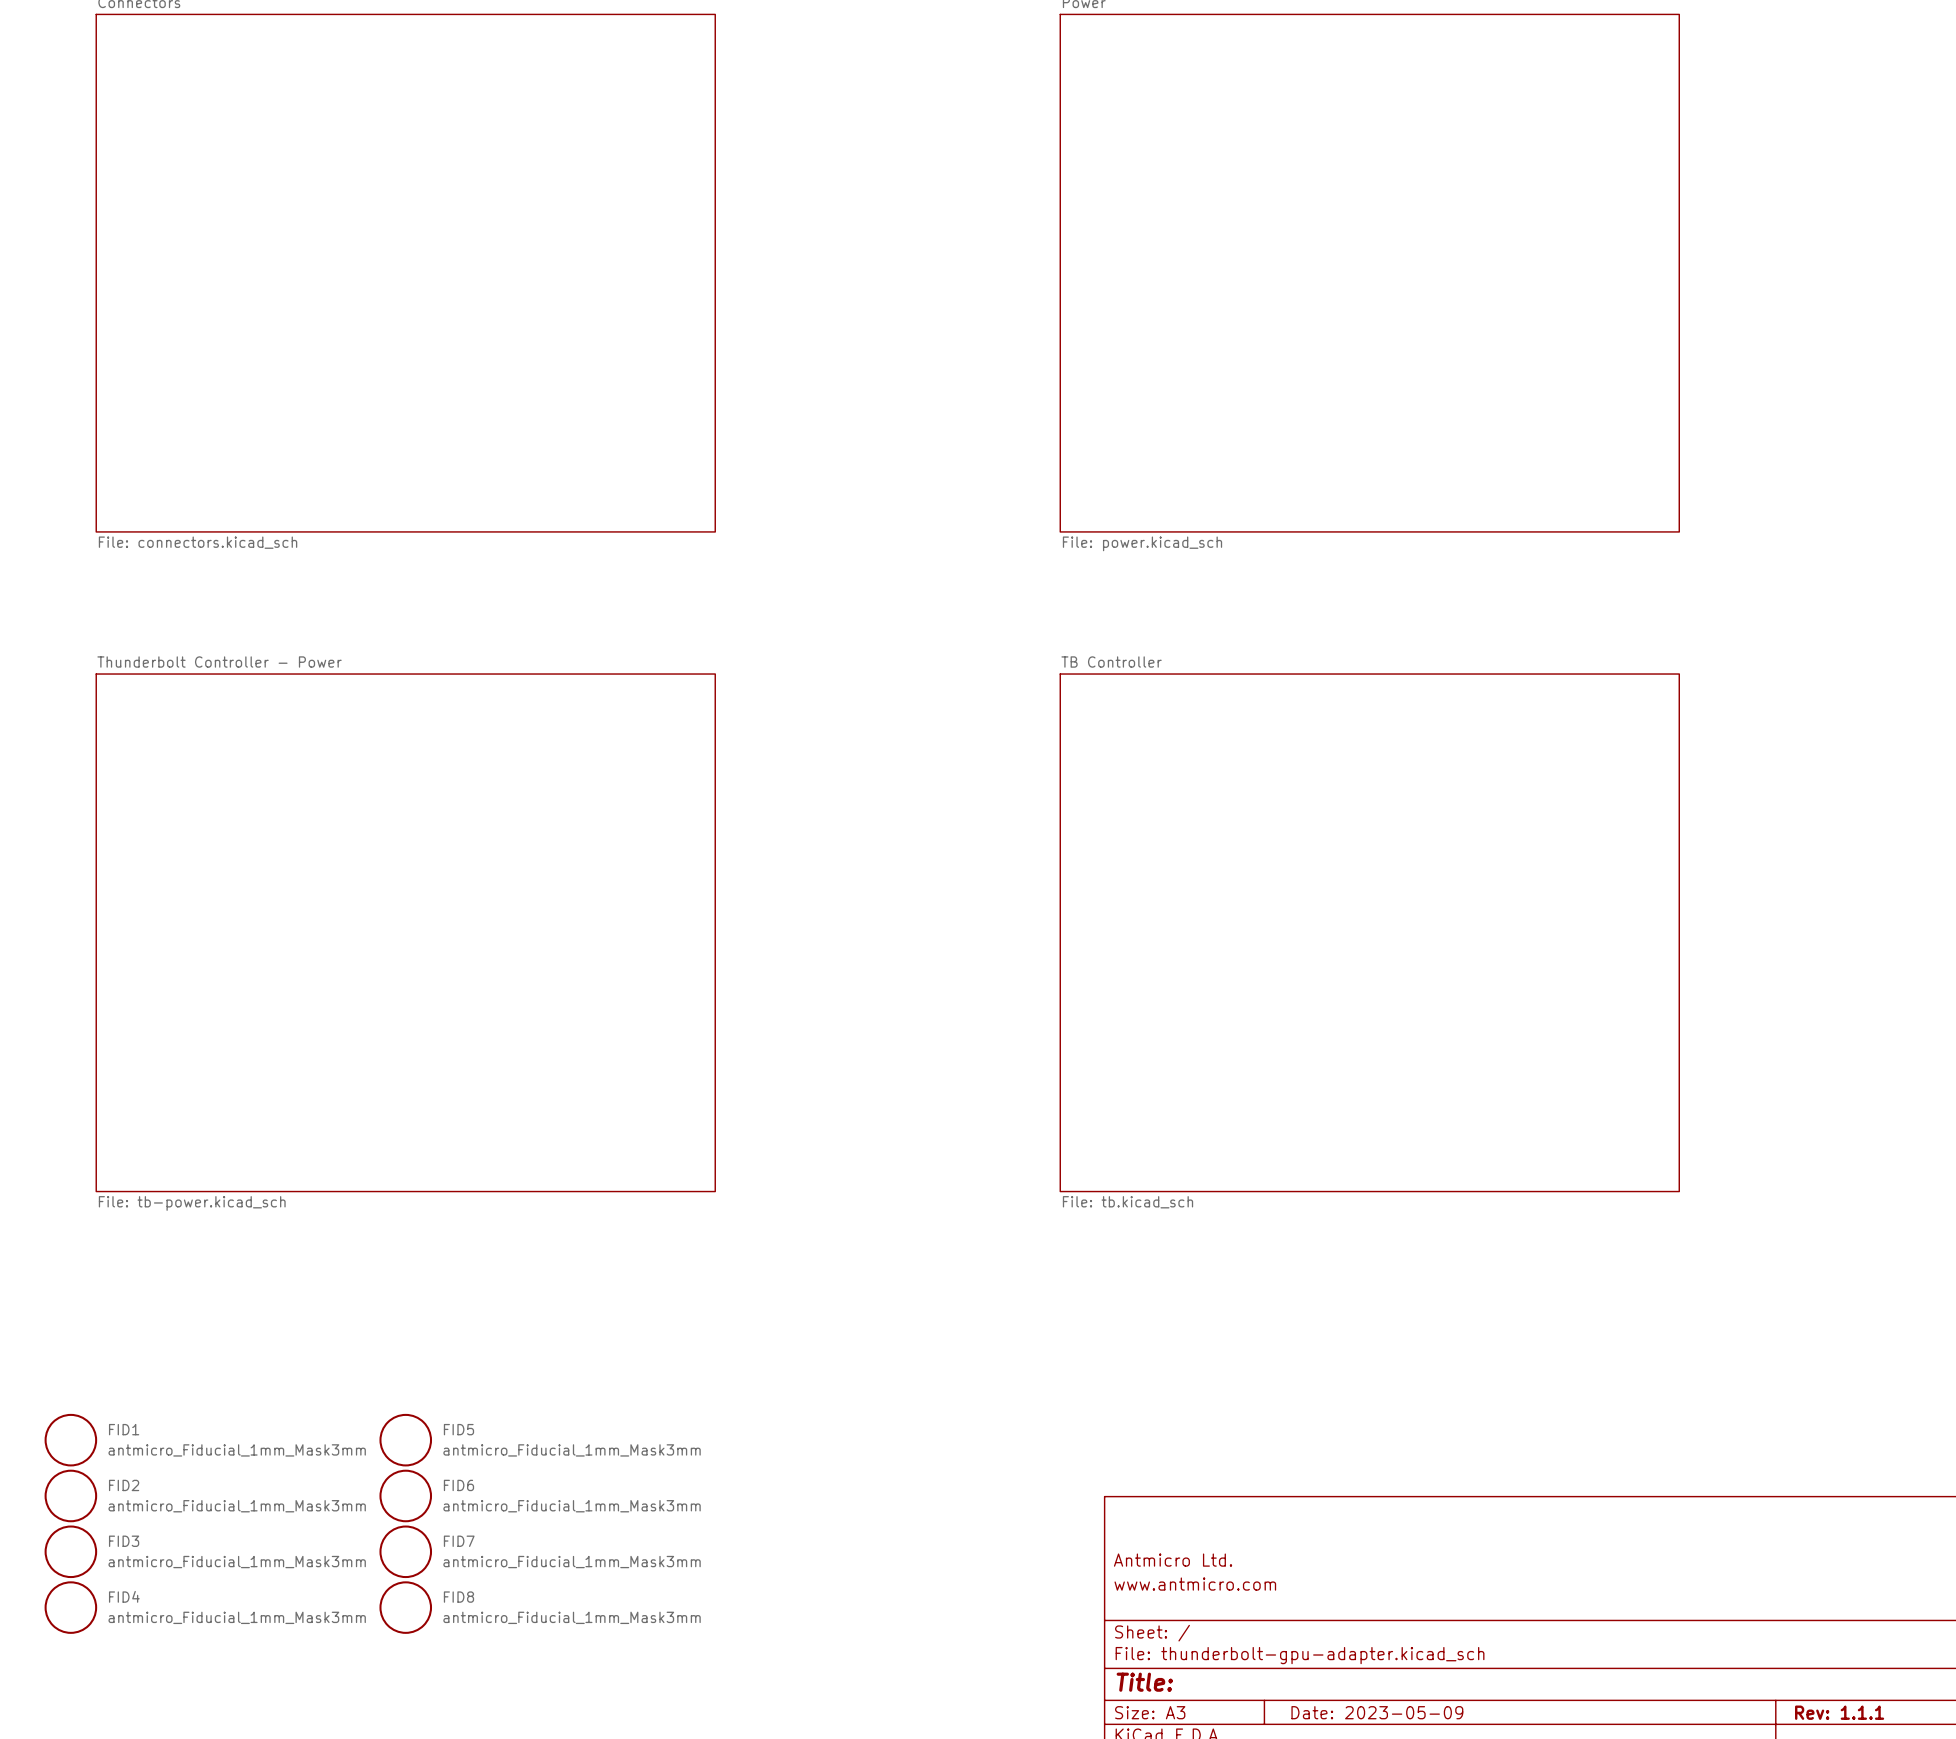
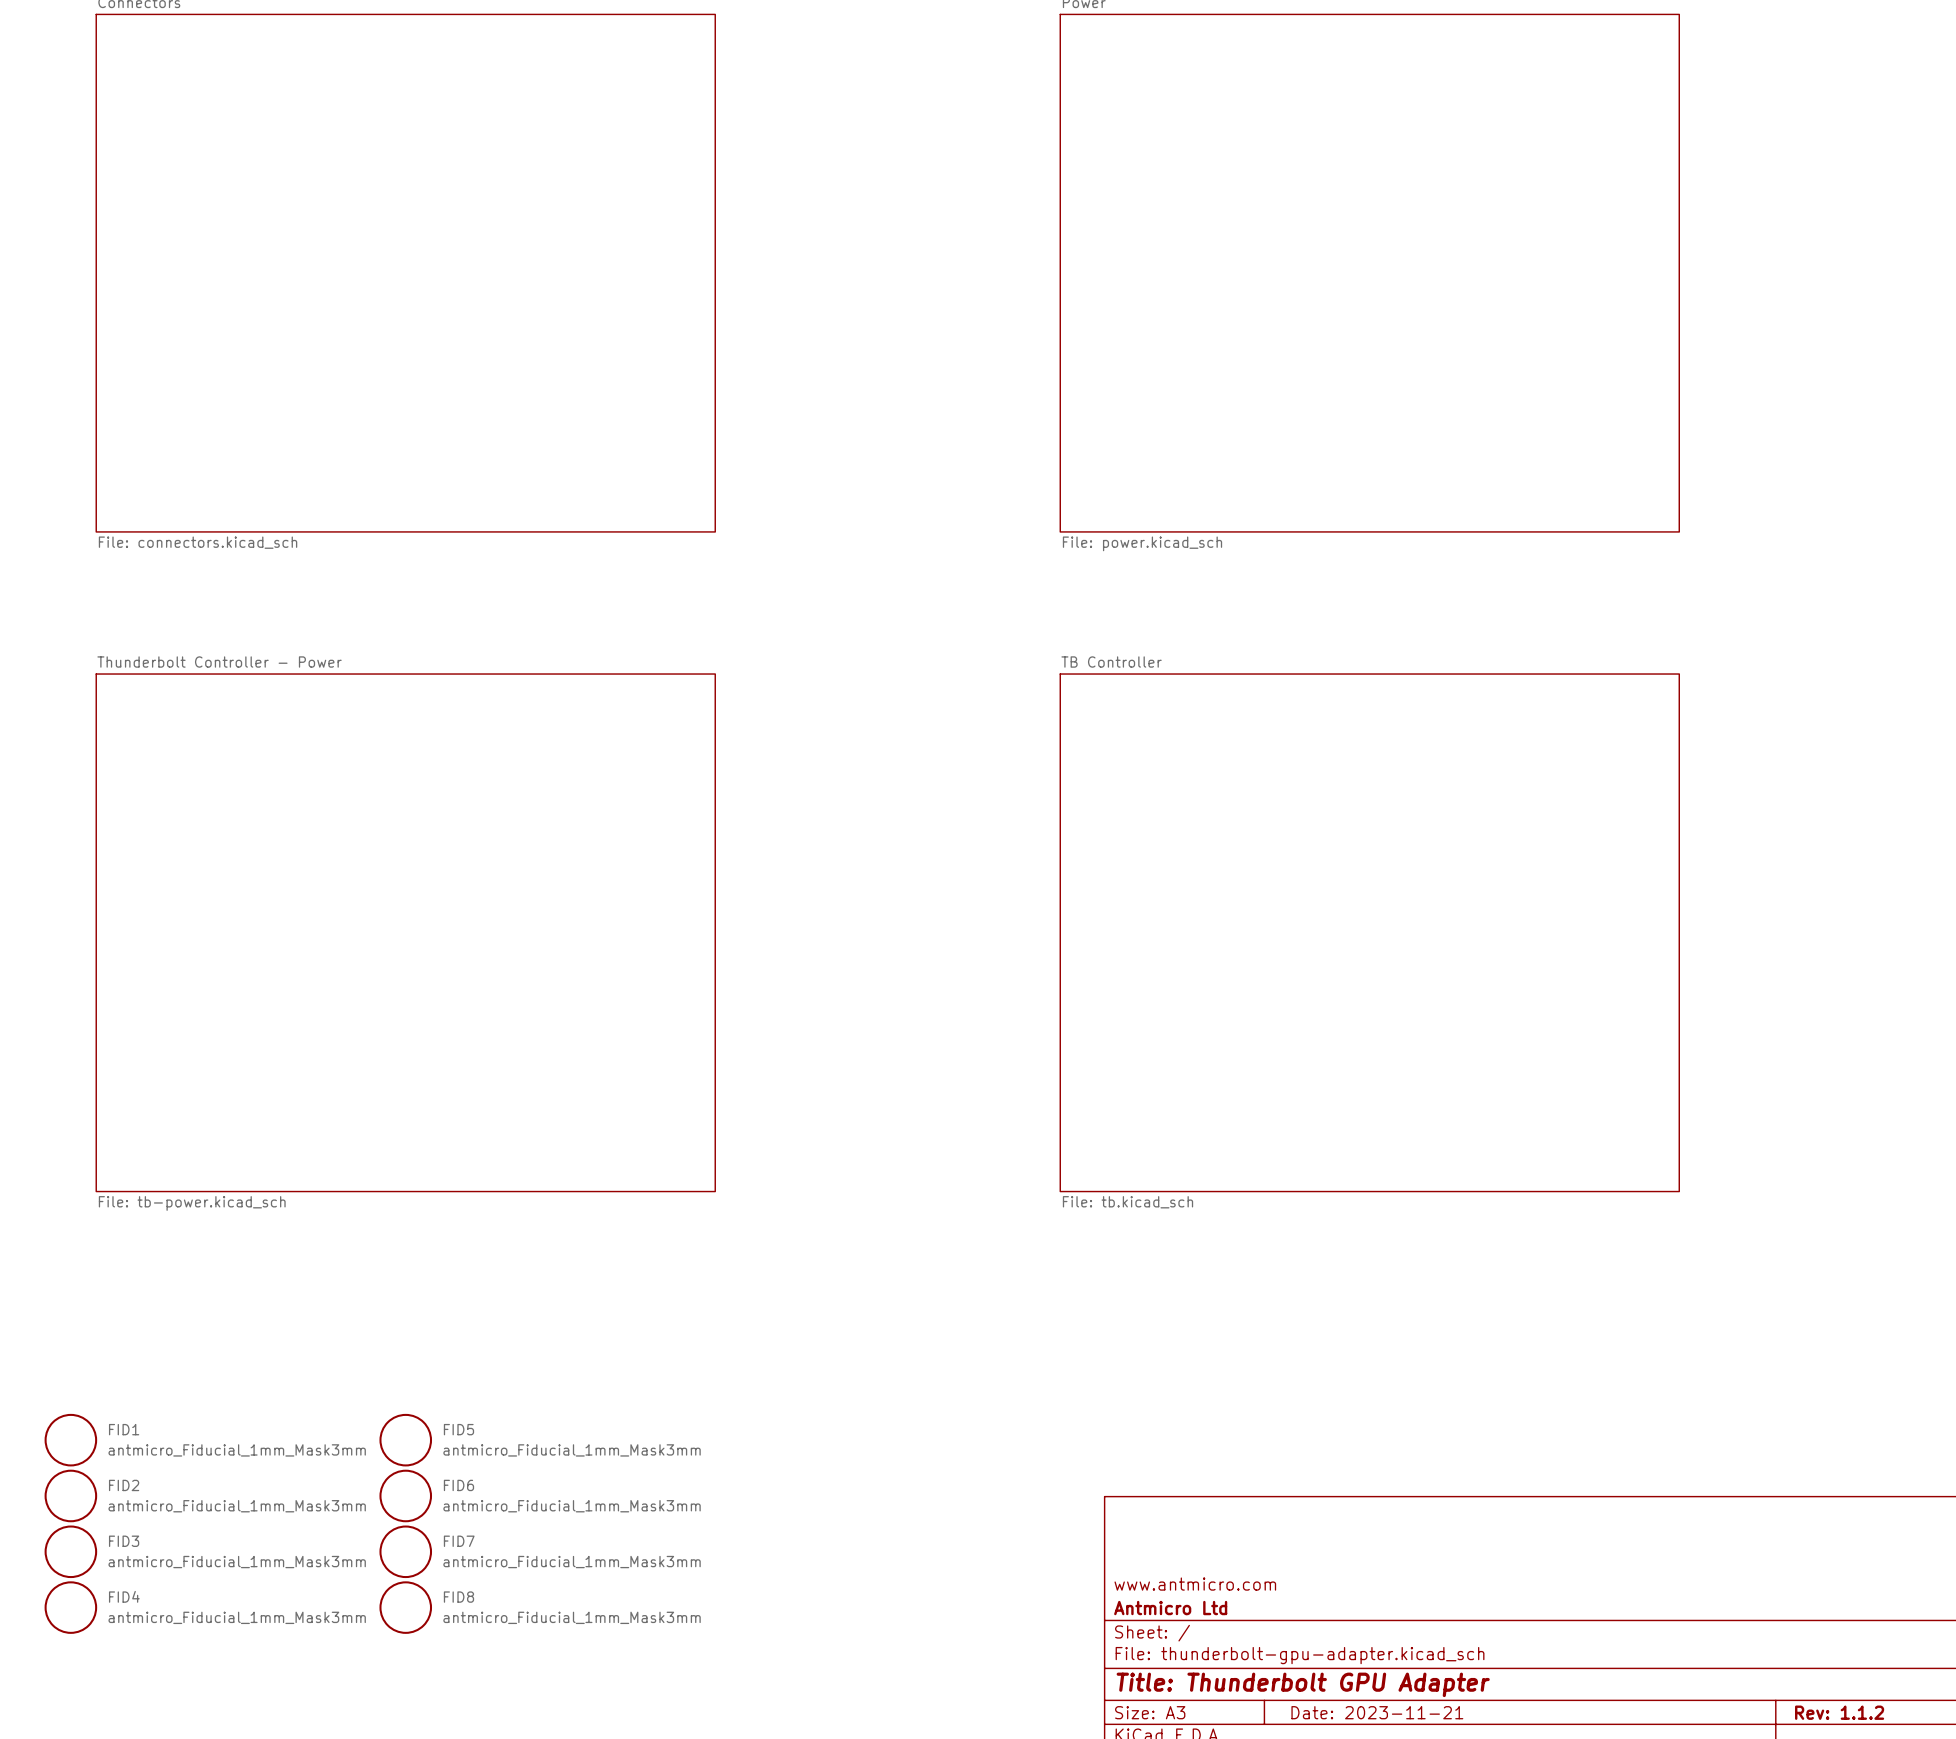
title block: Antmicro Ltd. (1173, 1560) -> none
title block: none -> Antmicro Ltd (1170, 1608)
title block: Title: (1144, 1682) -> Title: Thunderbolt GPU Adapter (1303, 1684)
title block: Date: 2023-05-09 (1377, 1712) -> Date: 2023-11-21 (1377, 1712)
title block: Rev: 1.1.1 (1839, 1712) -> Rev: 1.1.2 (1839, 1712)

